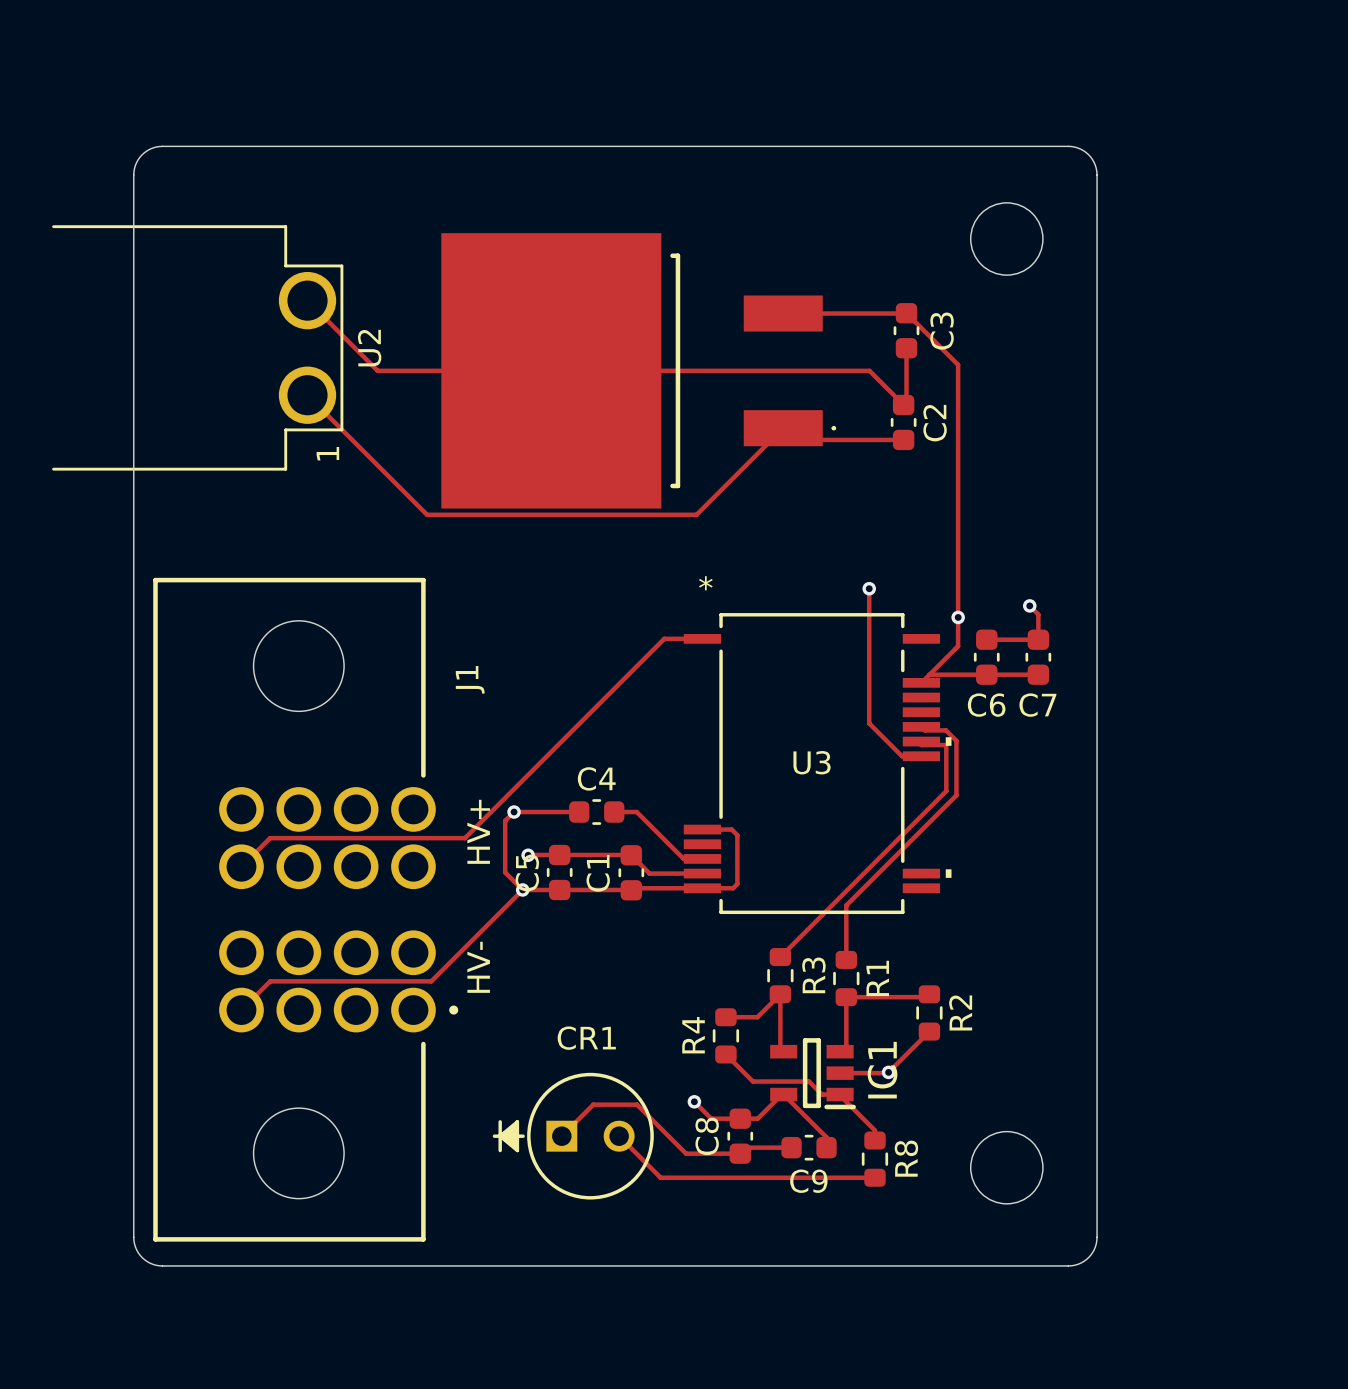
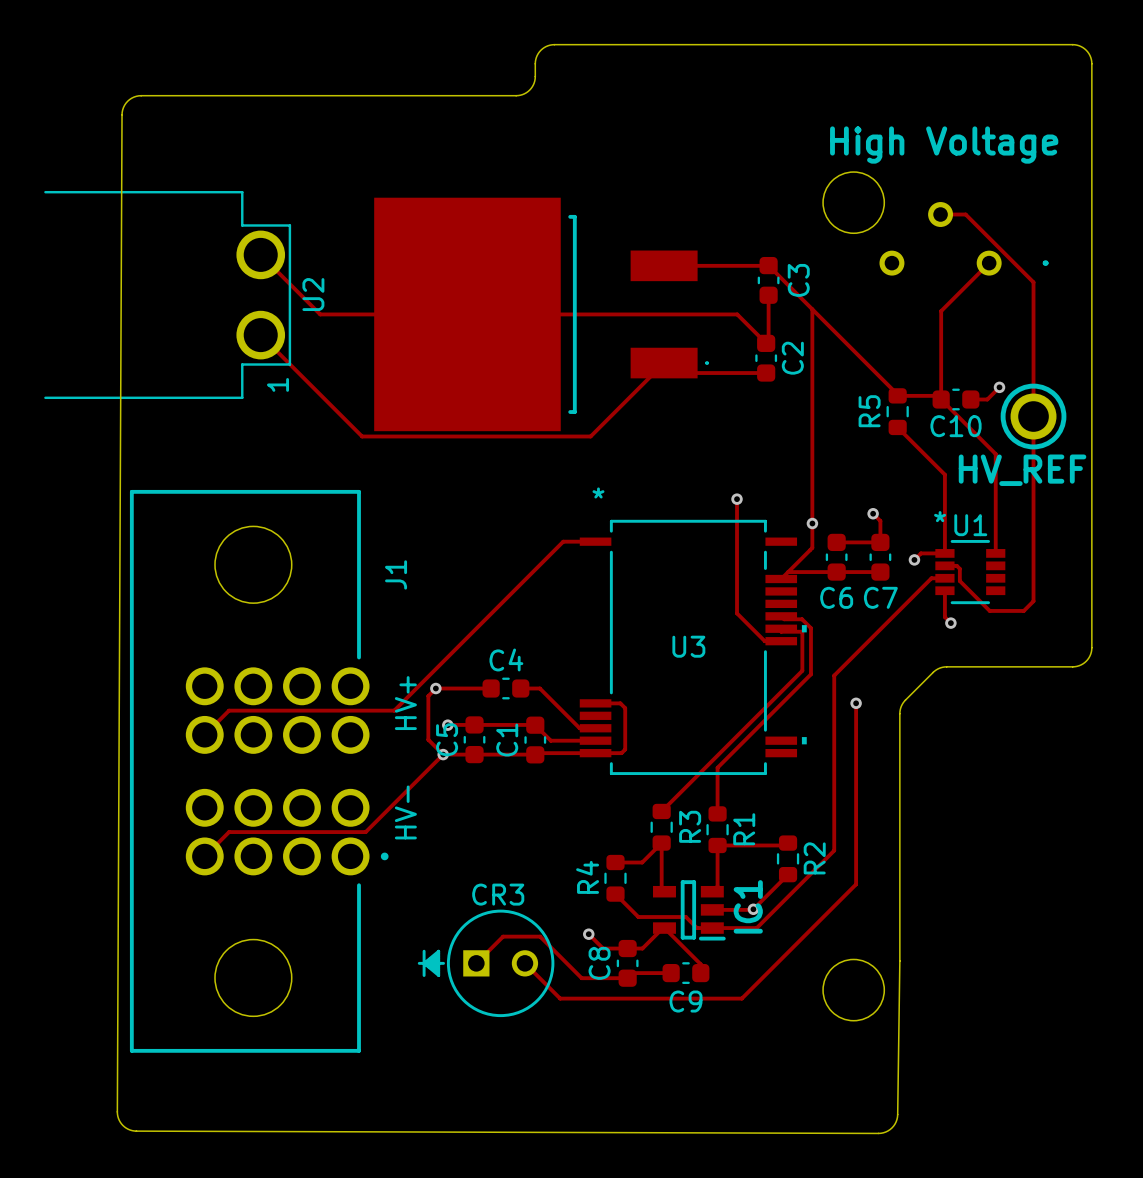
board edge: (162, 146) (1068, 146) (1080, 149) (1090, 157) (1095, 165) (1097, 175) (1097, 1237) (1094, 1249) (1086, 1259) (1077, 1264) (1068, 1265) (162, 1265) (149, 1263) (140, 1255) (135, 1246) (133, 1237) (133, 175) (135, 165) (142, 154) (152, 147) (162, 146) -> (554, 44) (546, 46) (539, 51) (535, 59) (533, 84) (528, 91) (518, 95) (141, 95) (131, 98) (123, 107) (117, 1111) (120, 1122) (130, 1130) (878, 1133) (888, 1130) (895, 1124) (897, 1114) (901, 706) (933, 672) (941, 667) (1074, 666) (1084, 662) (1090, 654) (1091, 63) (1087, 51) (1081, 46) (1072, 44) (554, 44)
track: none -> (940, 214) (965, 214) (1033, 282) (1033, 601) (1023, 610) (989, 610) (959, 581) (959, 568) (956, 565) (944, 565)
part: none -> (963, 238)
track: none -> (989, 263) (941, 311) (941, 399)
track: none -> (812, 309) (897, 395) (937, 395) (995, 454) (995, 553)
track: none -> (999, 387) (987, 399) (970, 399)
via: none -> (999, 387)
C10: none -> (956, 399)
R5: none -> (897, 411)
part: none -> (1033, 416)
track: none -> (897, 427) (944, 474) (944, 553) (920, 553) (914, 559)
via: none -> (914, 559)
U1: none -> (970, 572)
track: none -> (944, 578) (931, 578) (834, 675) (834, 850) (756, 928) (712, 928)
track: none -> (944, 590) (944, 617) (950, 623)
via: none -> (950, 623)
track: none -> (856, 703) (856, 884) (741, 998)
via: none -> (856, 703)
CR1 name: CR1 (586, 1038) -> CR3 (498, 894)
track: (840, 1095) (874, 1130) (874, 1140) -> none
R8: (874, 1159) -> none

